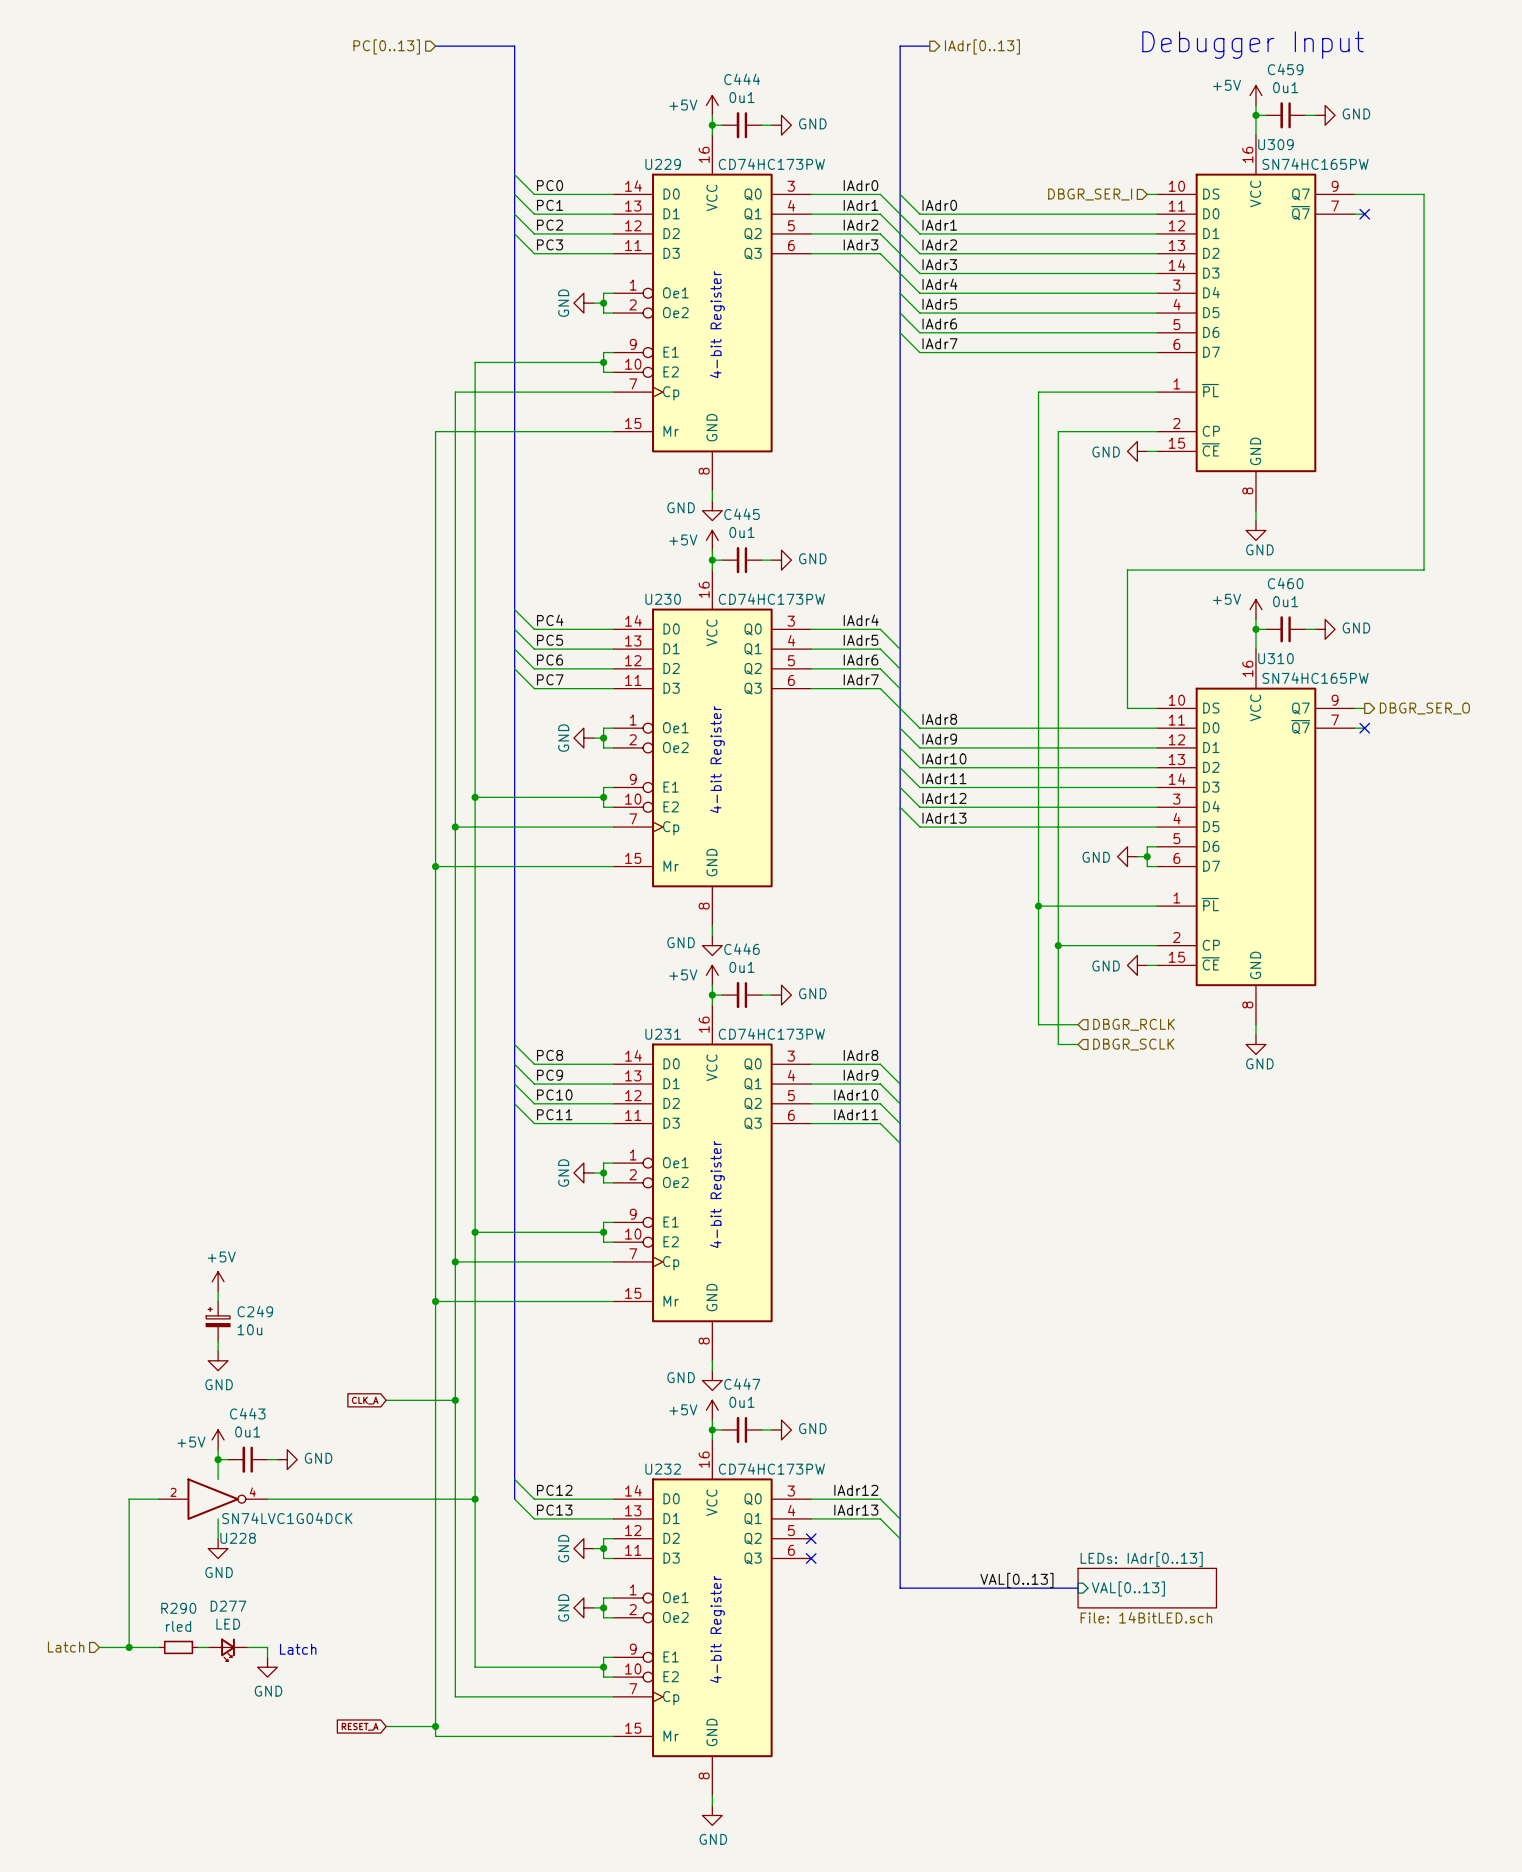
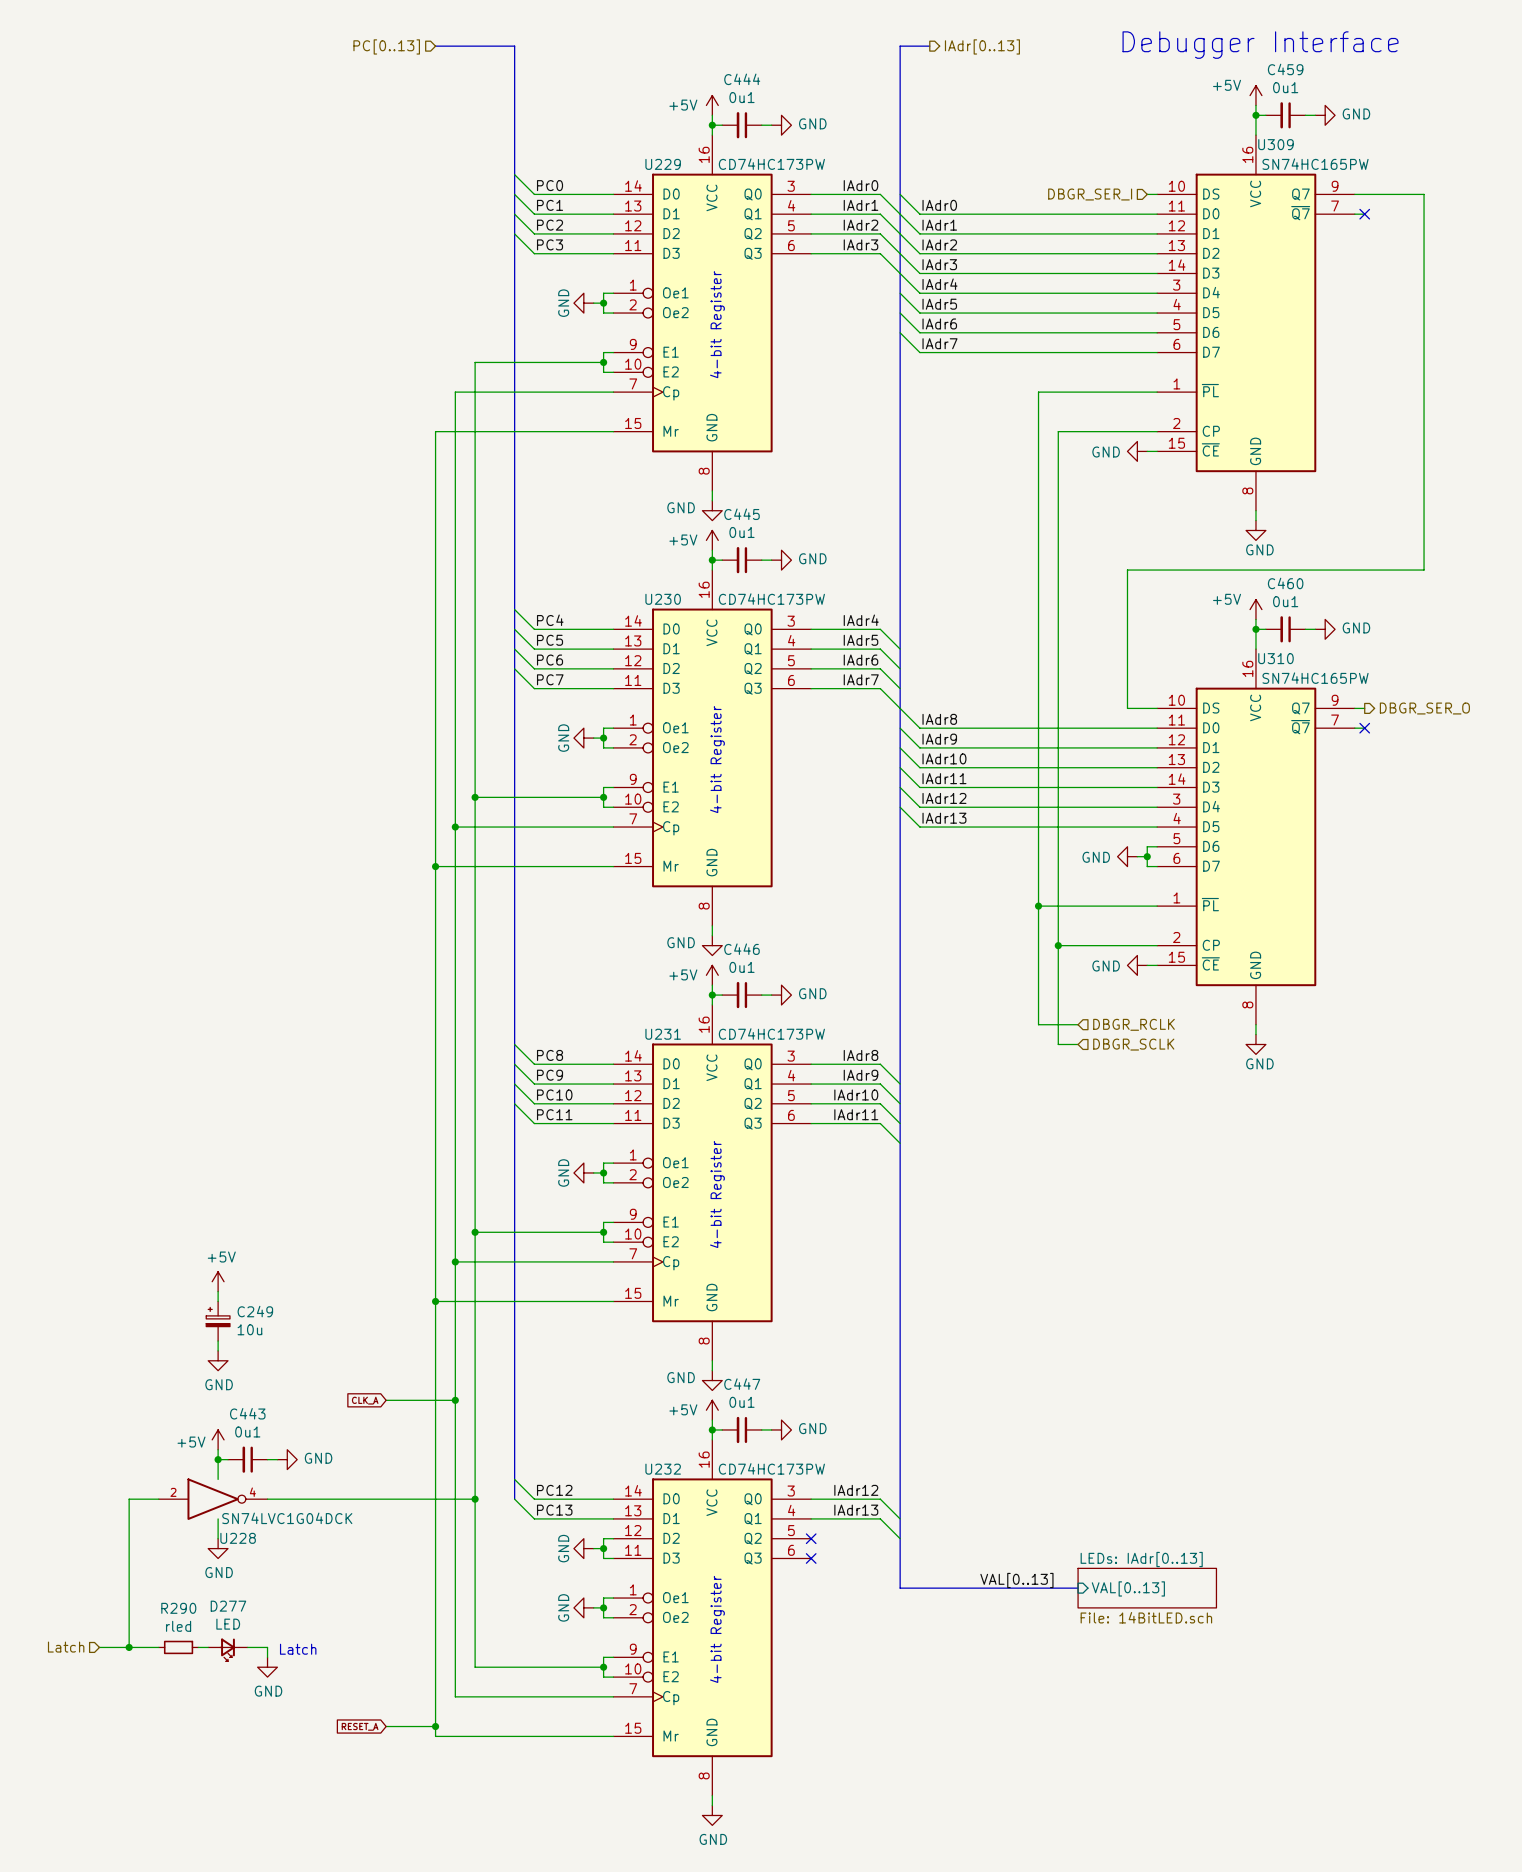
text: Debugger Input (1253, 45) -> Debugger Interface (1260, 45)

